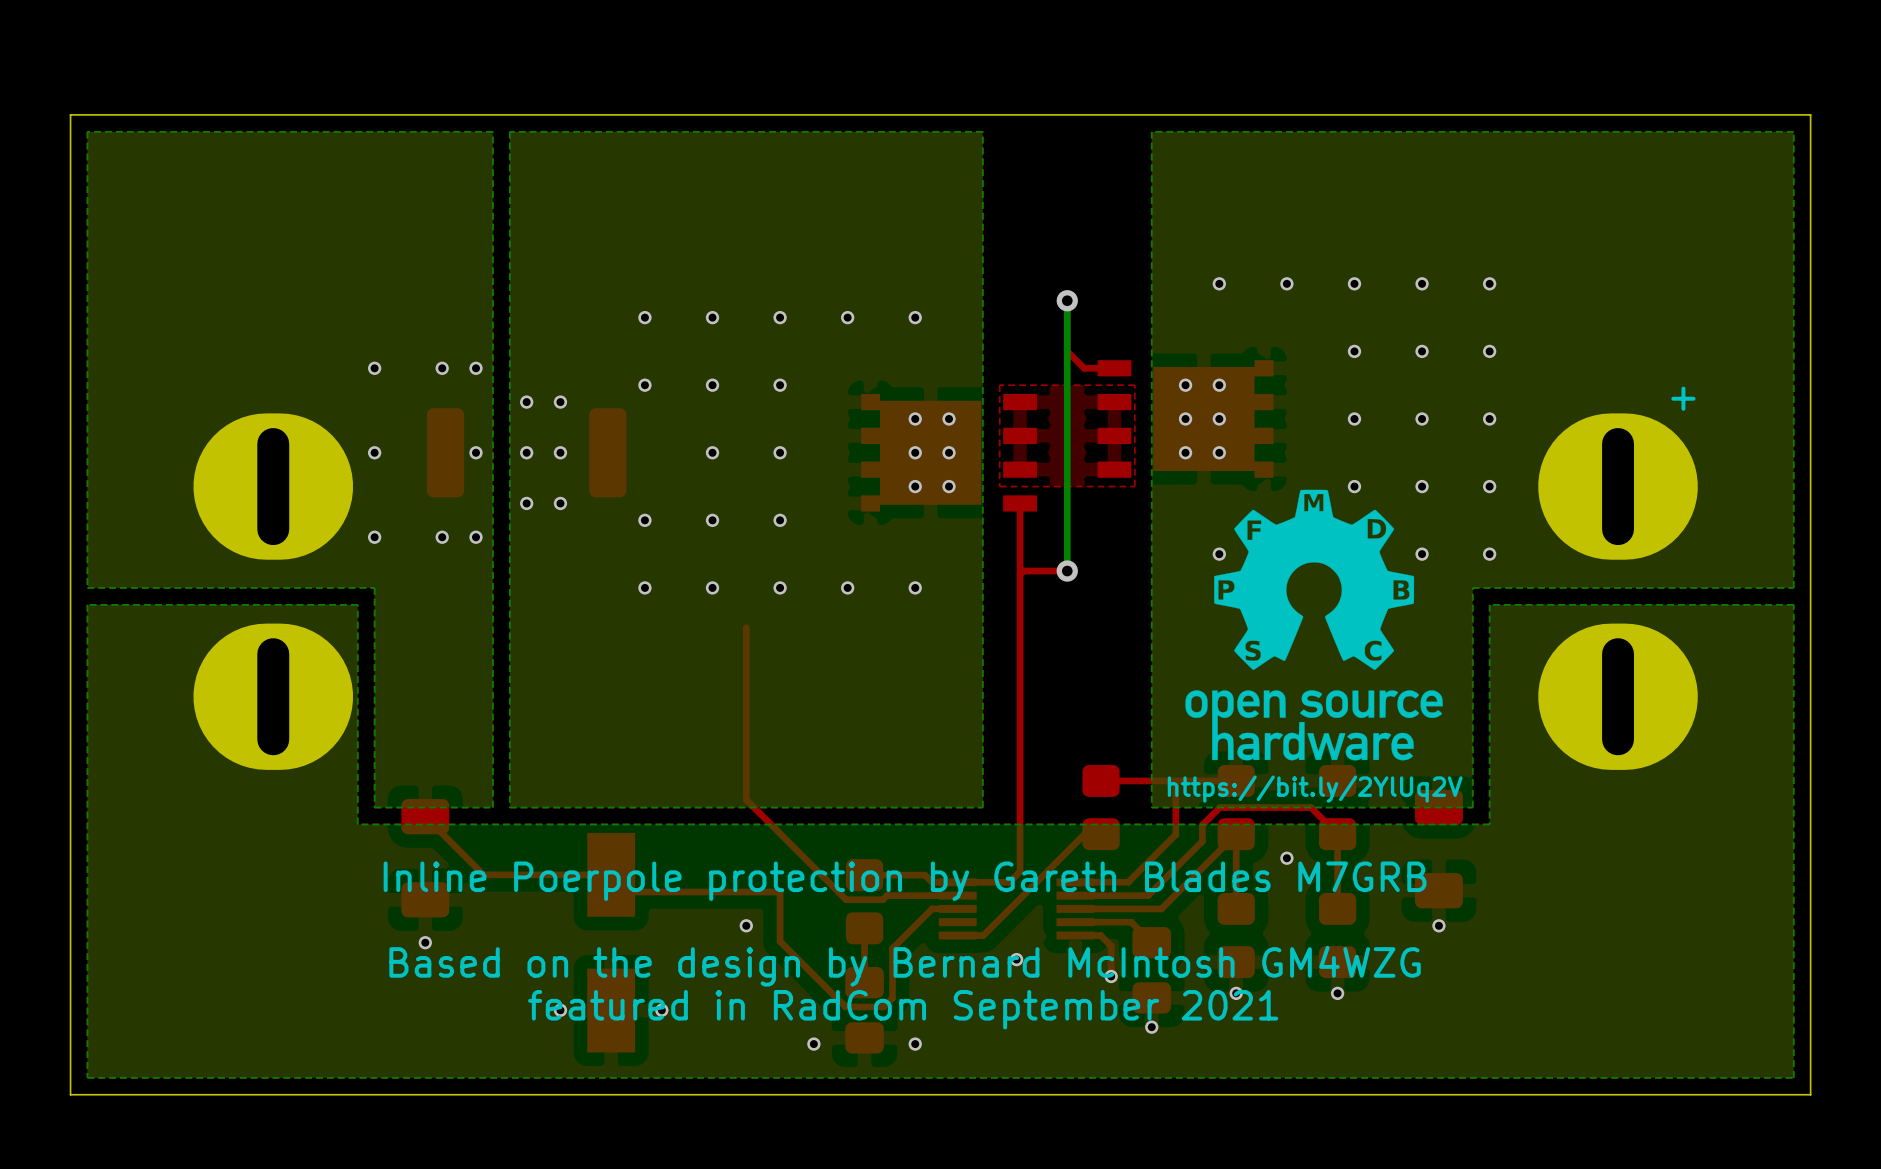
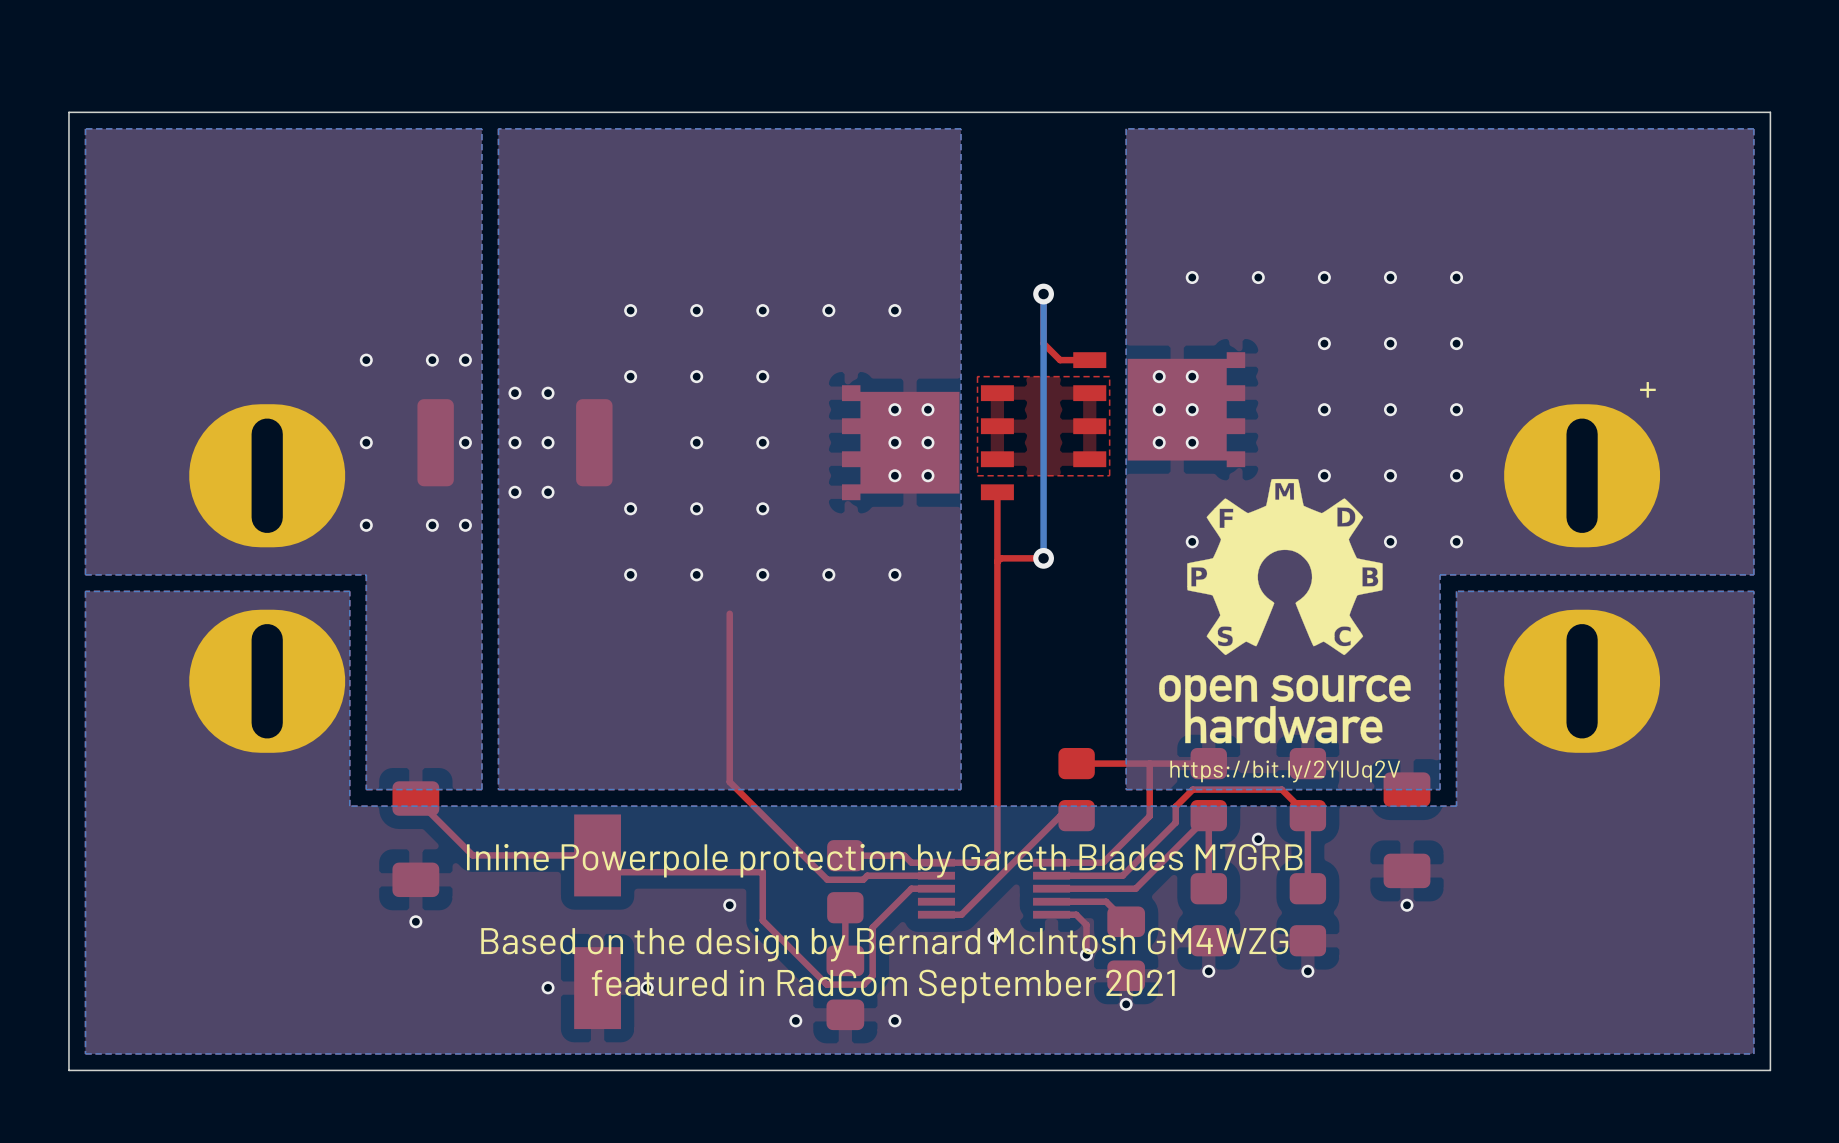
text: Inline Poerpole protection by Gareth Blades M7GRB (905, 881) -> Inline Powerpole protection by Gareth Blades M7GRB (884, 860)

